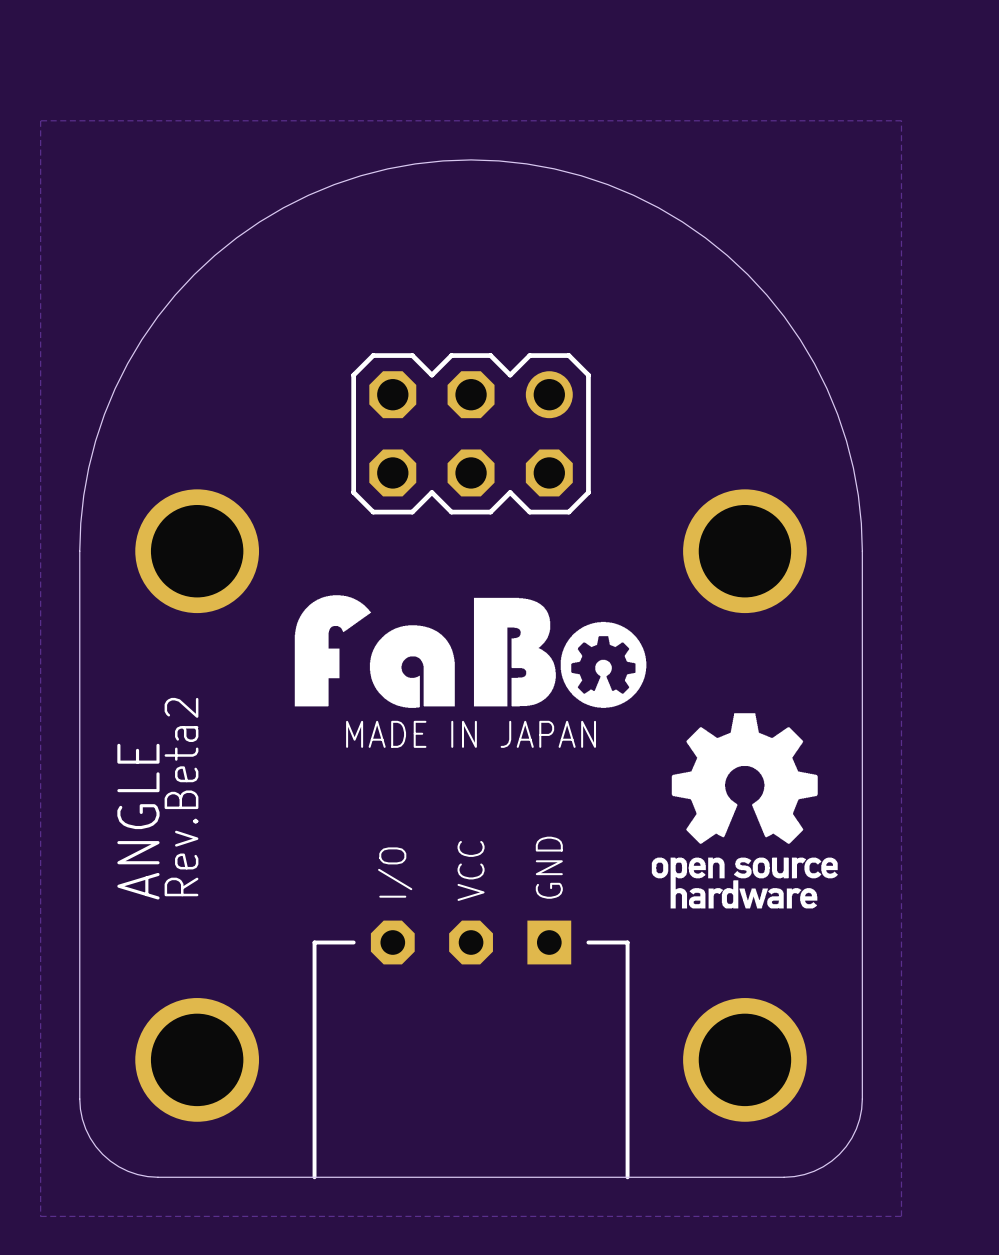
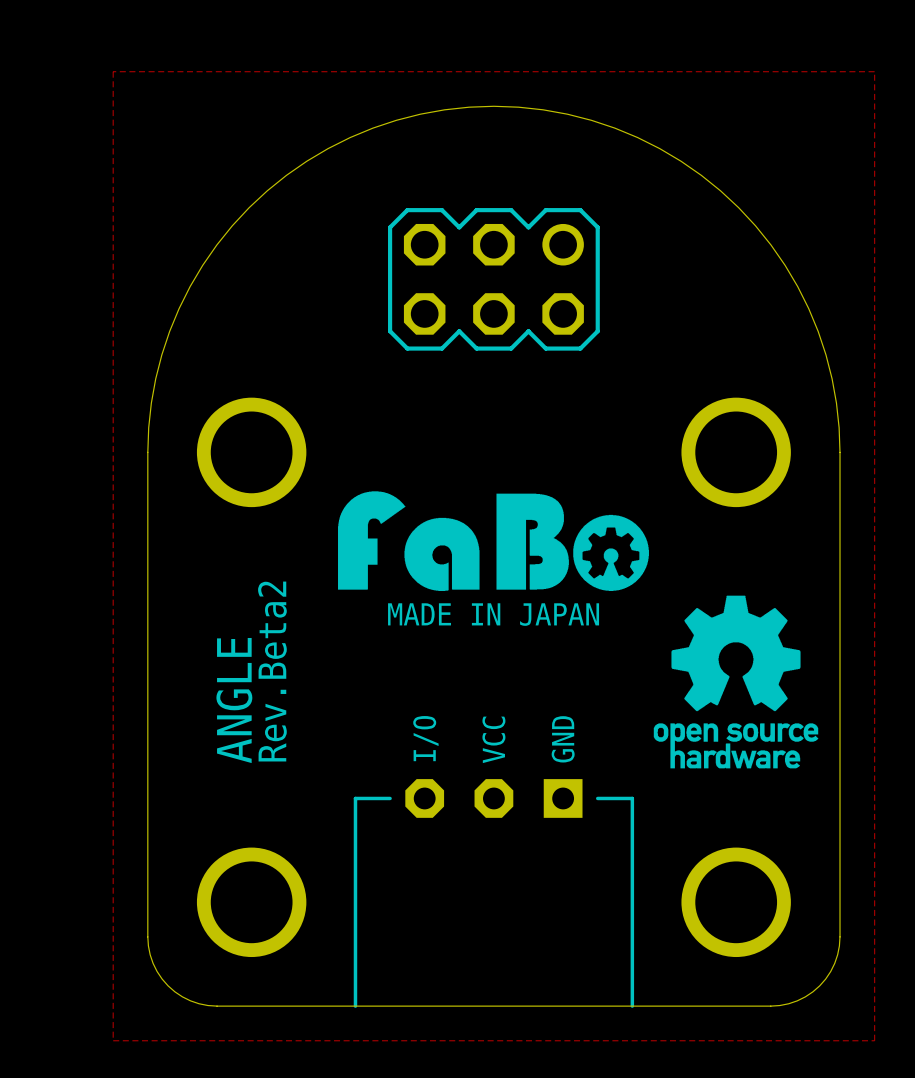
part position: (471, 433) -> (493, 279)
text: Rev.Beta2 (181, 797) -> ANGLE (234, 700)
text: none -> Rev.Beta2 (272, 671)
text: ANGLE (138, 821) -> none

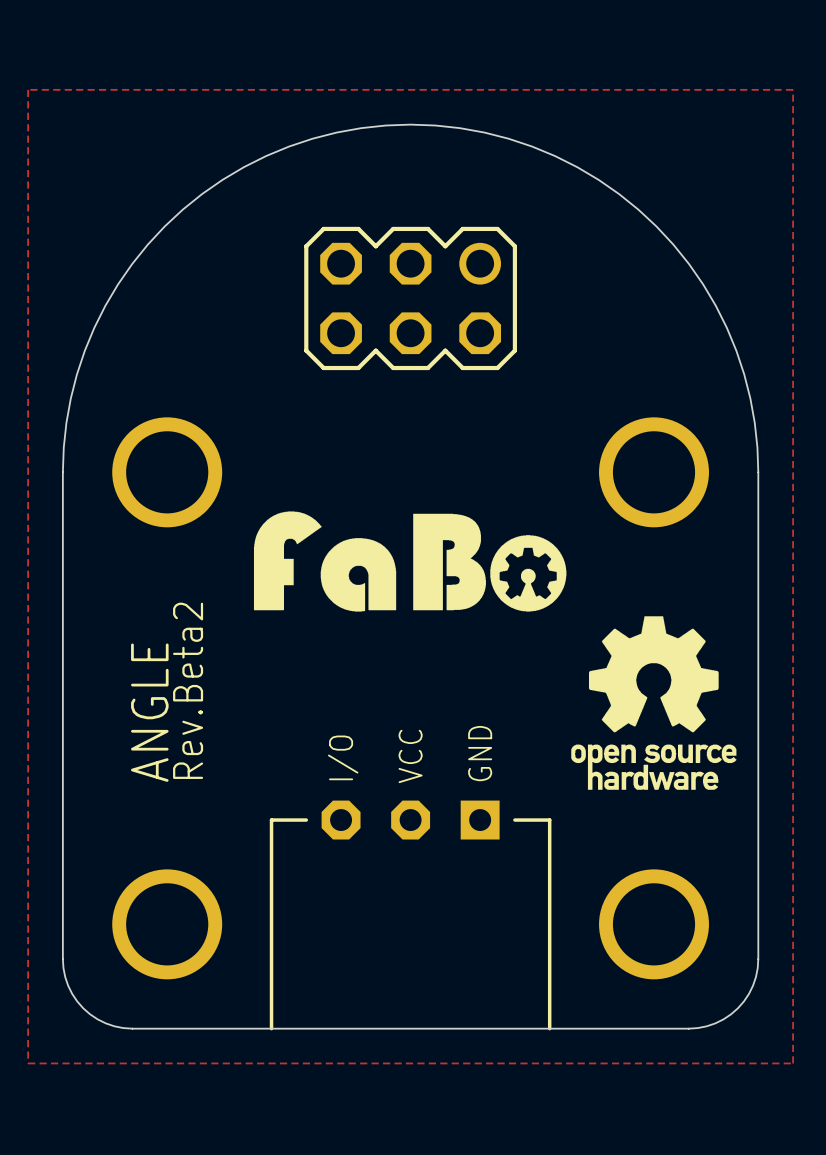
text: MADE IN JAPAN (493, 614) -> none

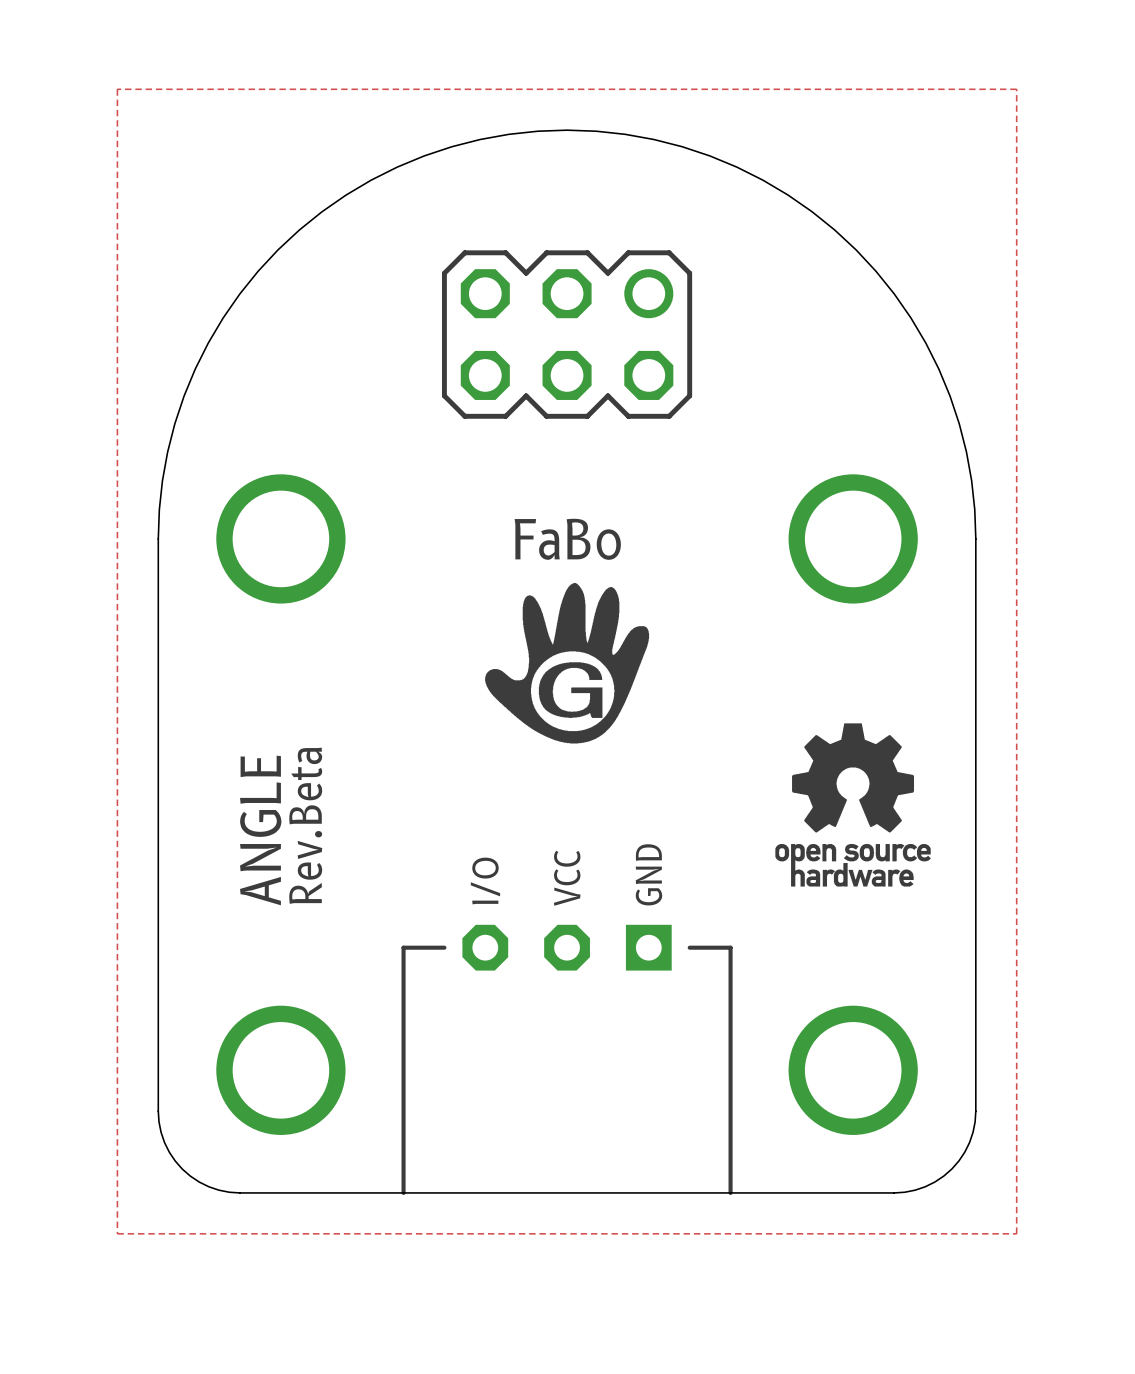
drawing shape: [253, 511, 567, 612] -> [485, 518, 650, 744]
drawing shape: [571, 616, 737, 790] -> [775, 723, 931, 887]
text: Rev.Beta2 (188, 690) -> Rev.Beta (305, 825)

